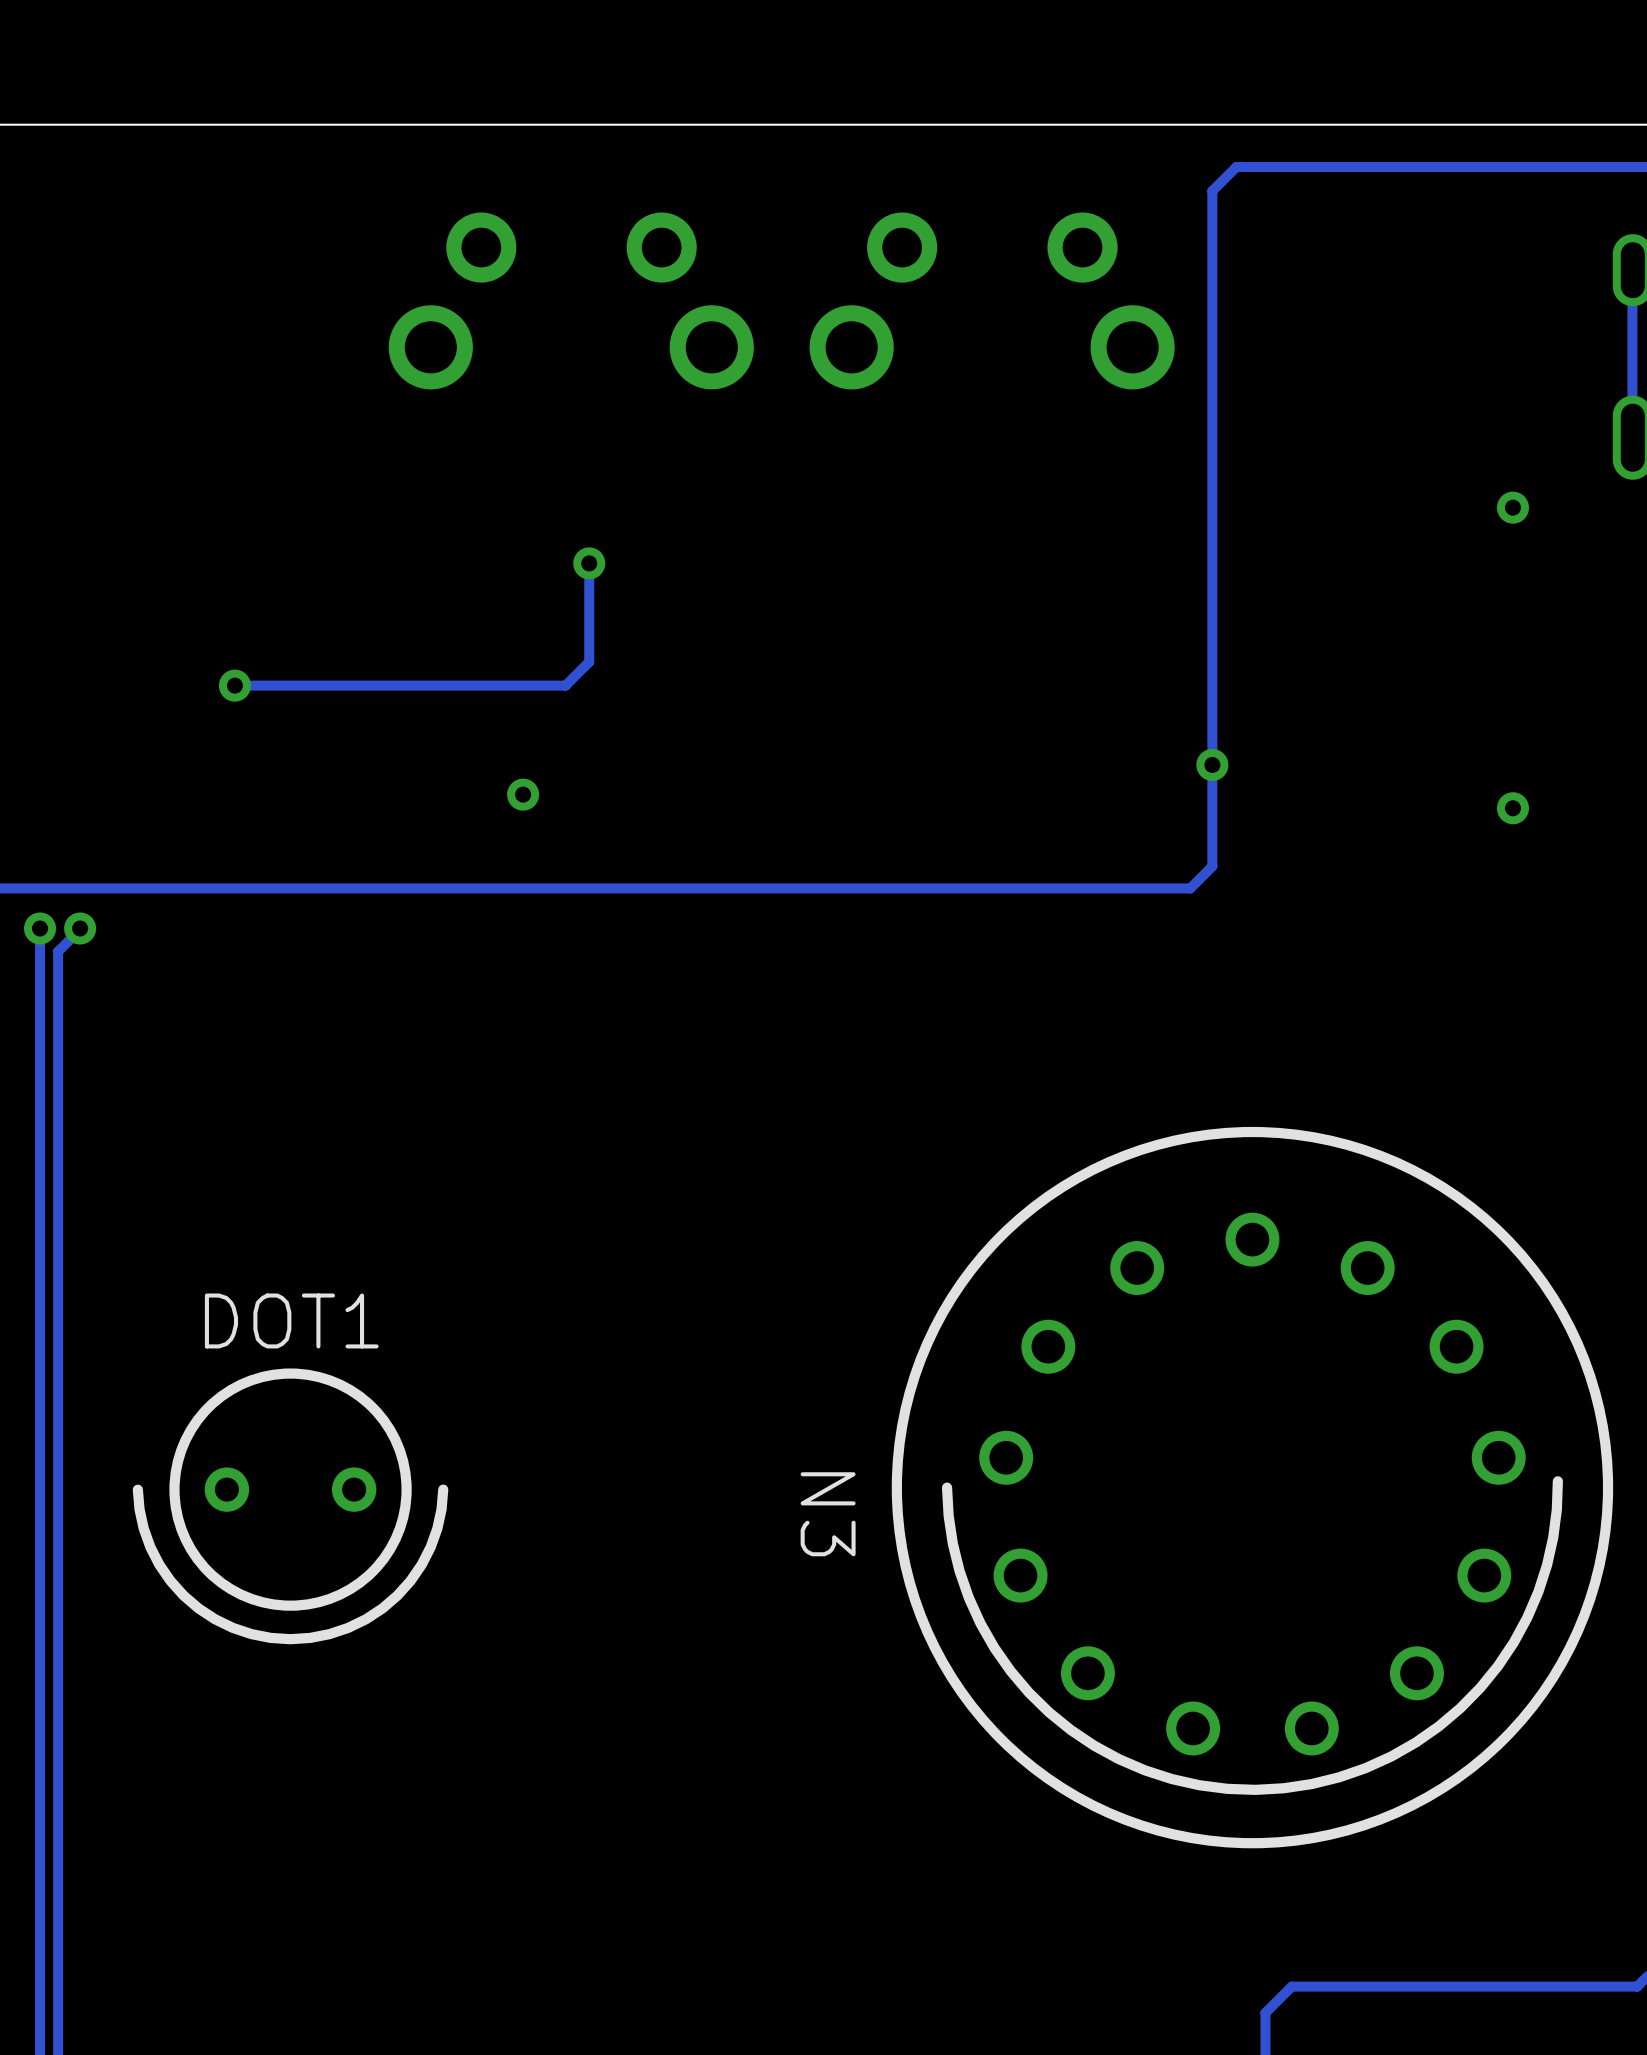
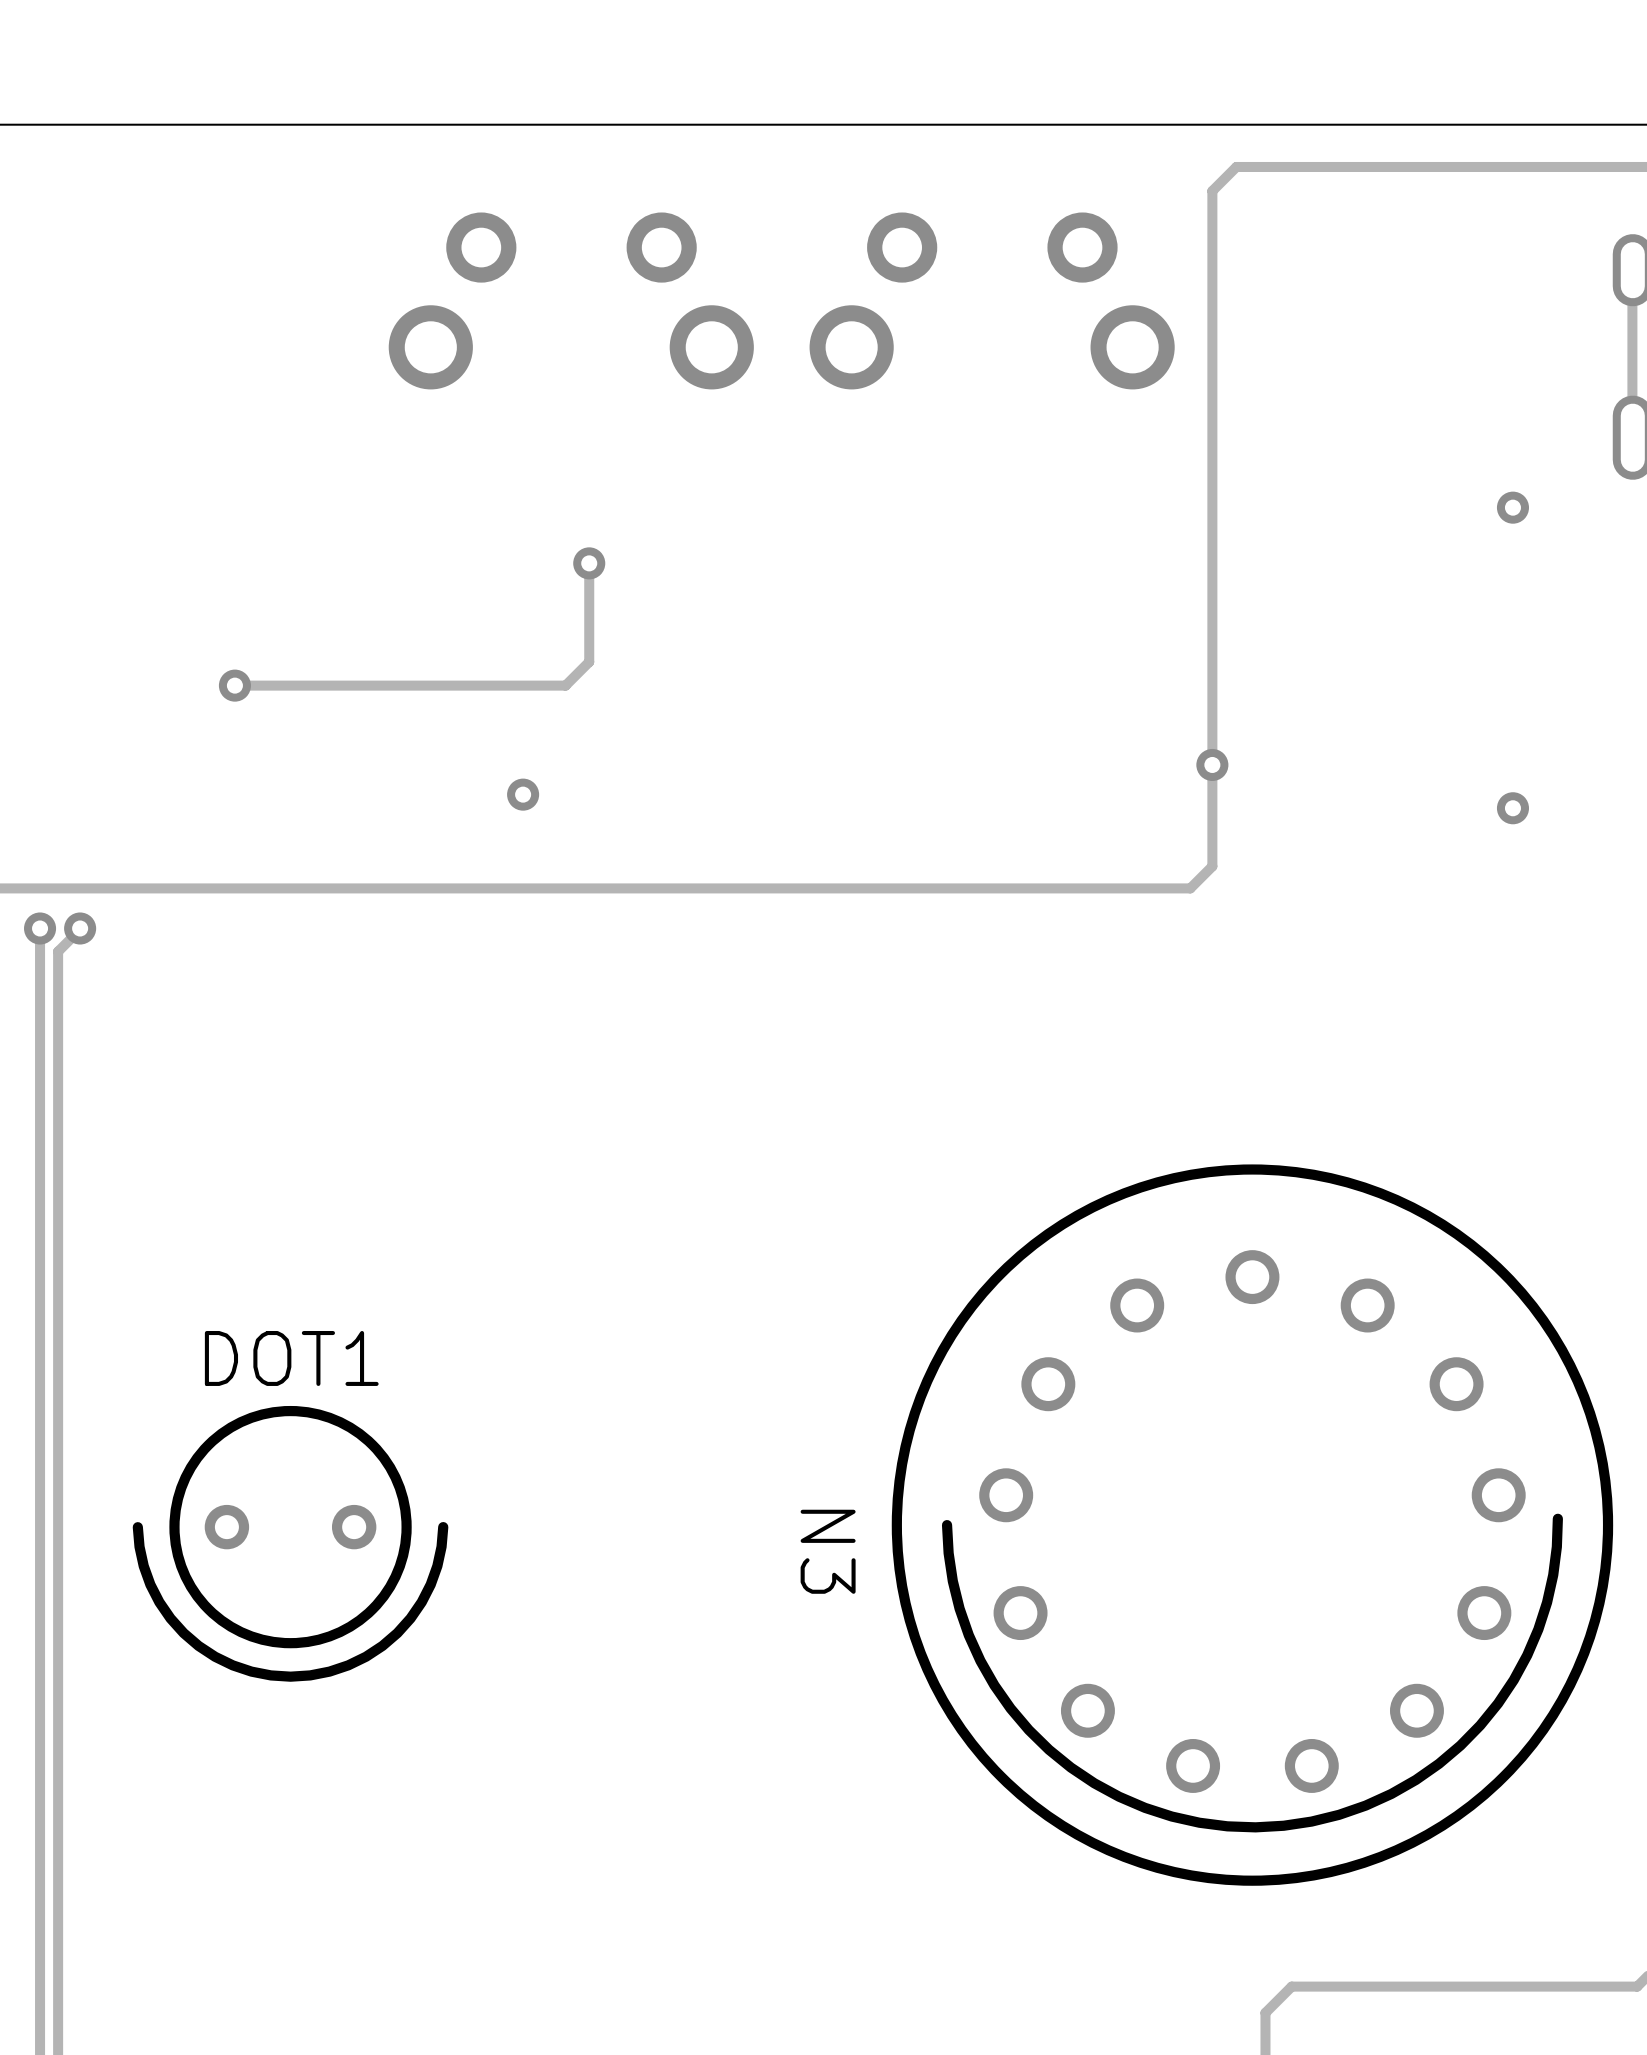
N3 position: (1252, 1487) -> (1252, 1525)
DOT1 position: (290, 1506) -> (290, 1543)

